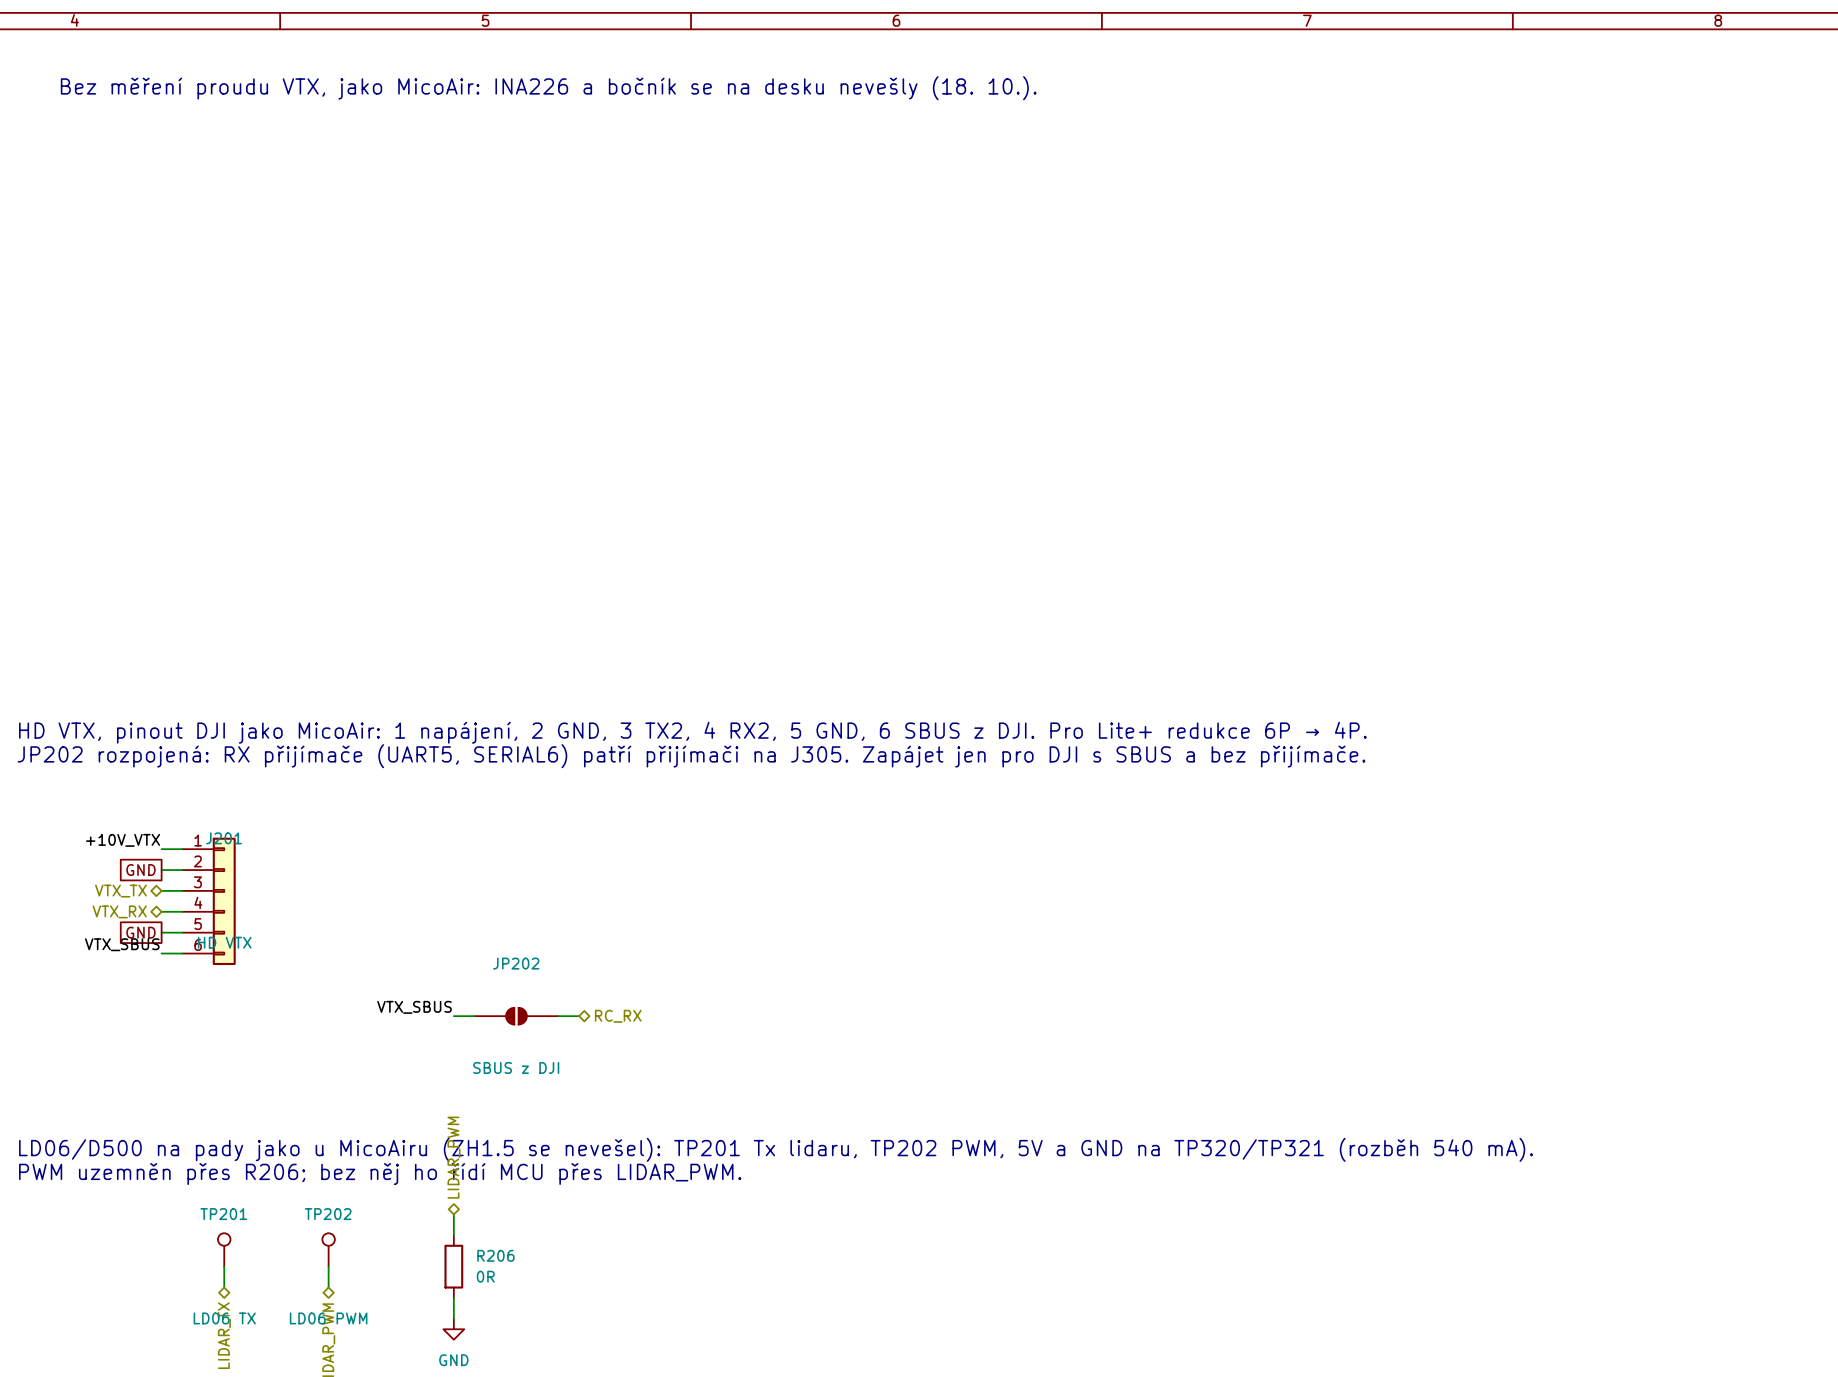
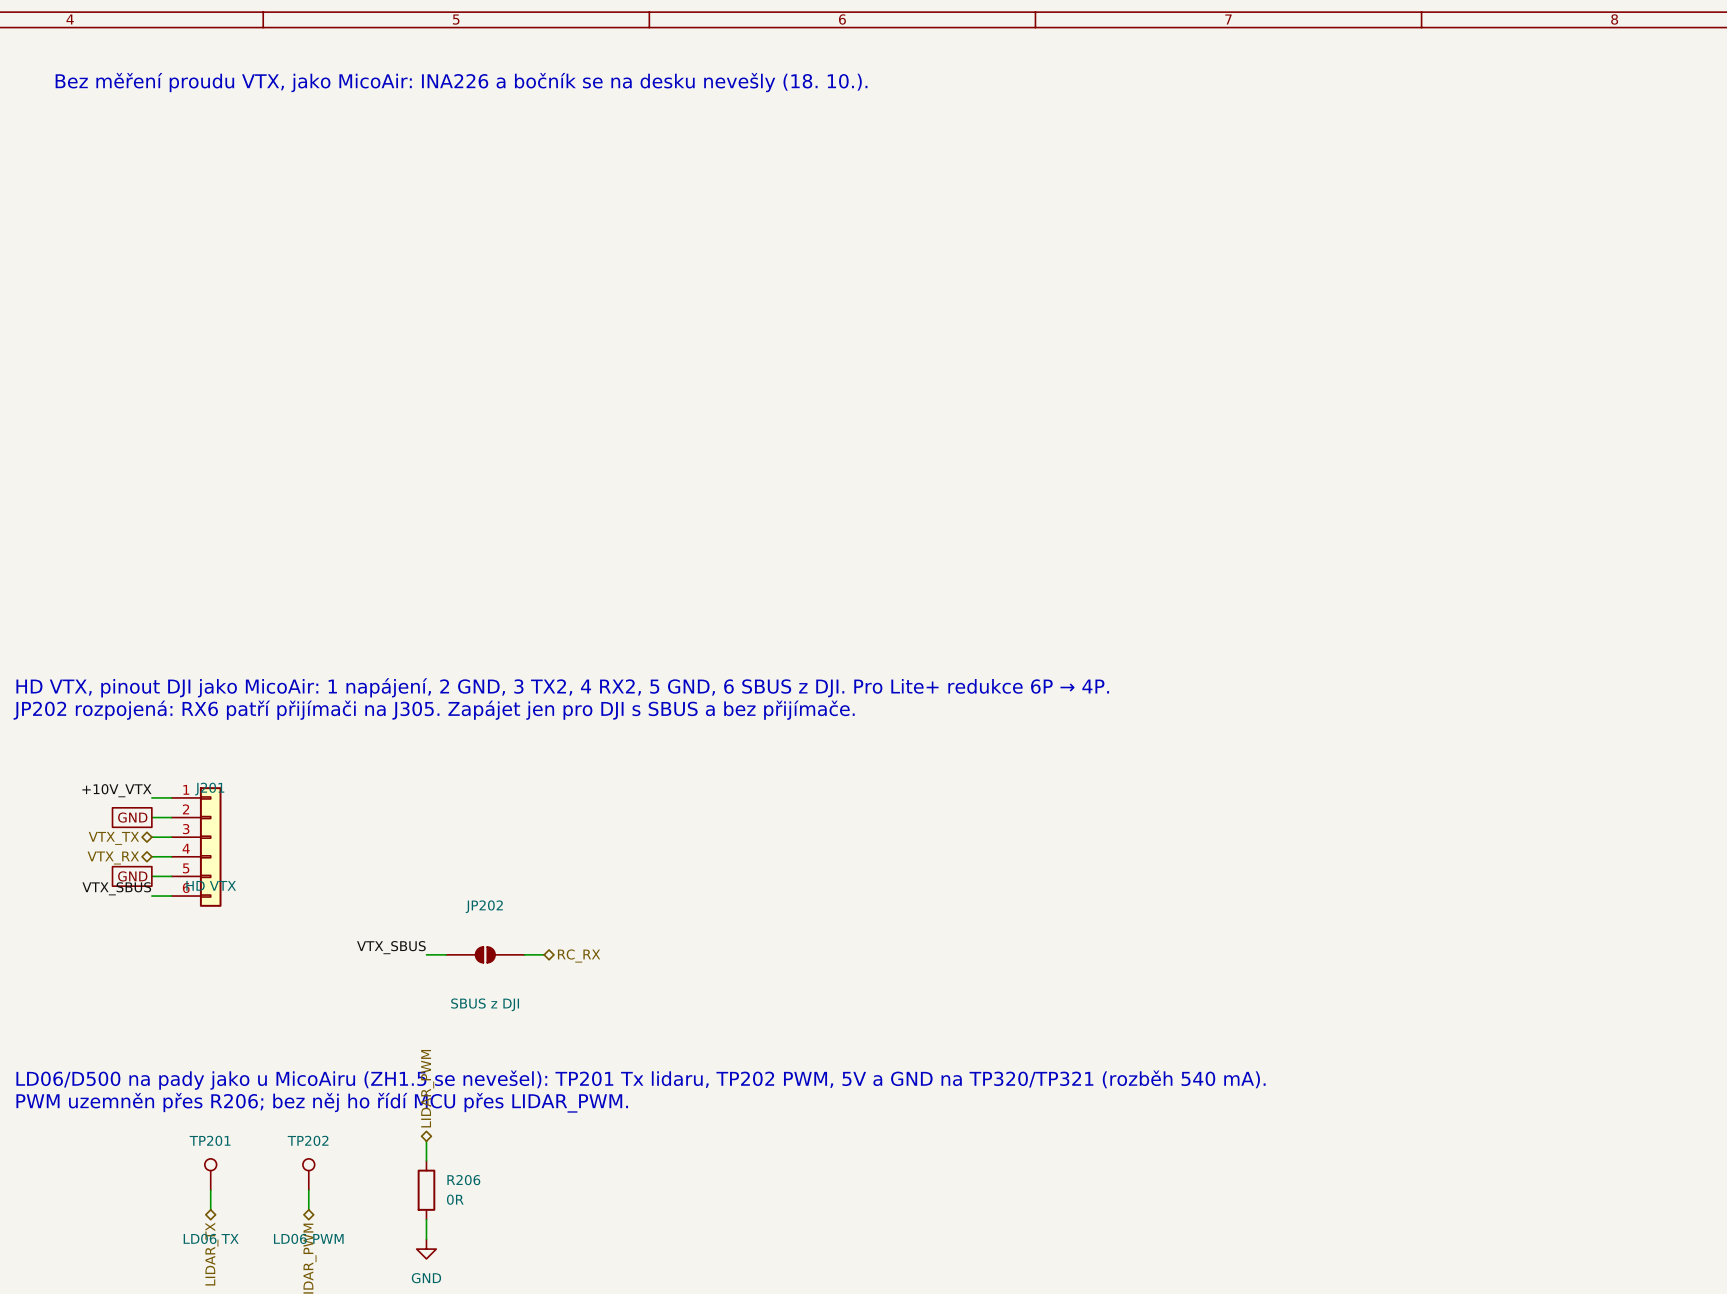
text: JP202 rozpojená: RX přijímače (UART5, SERIAL6) patří přijímači na J305. Zapájet jen pro DJI s SBUS a bez přijímače. (691, 756) -> JP202 rozpojená: RX6 patří přijímači na J305. Zapájet jen pro DJI s SBUS a bez přijímače. (434, 710)

